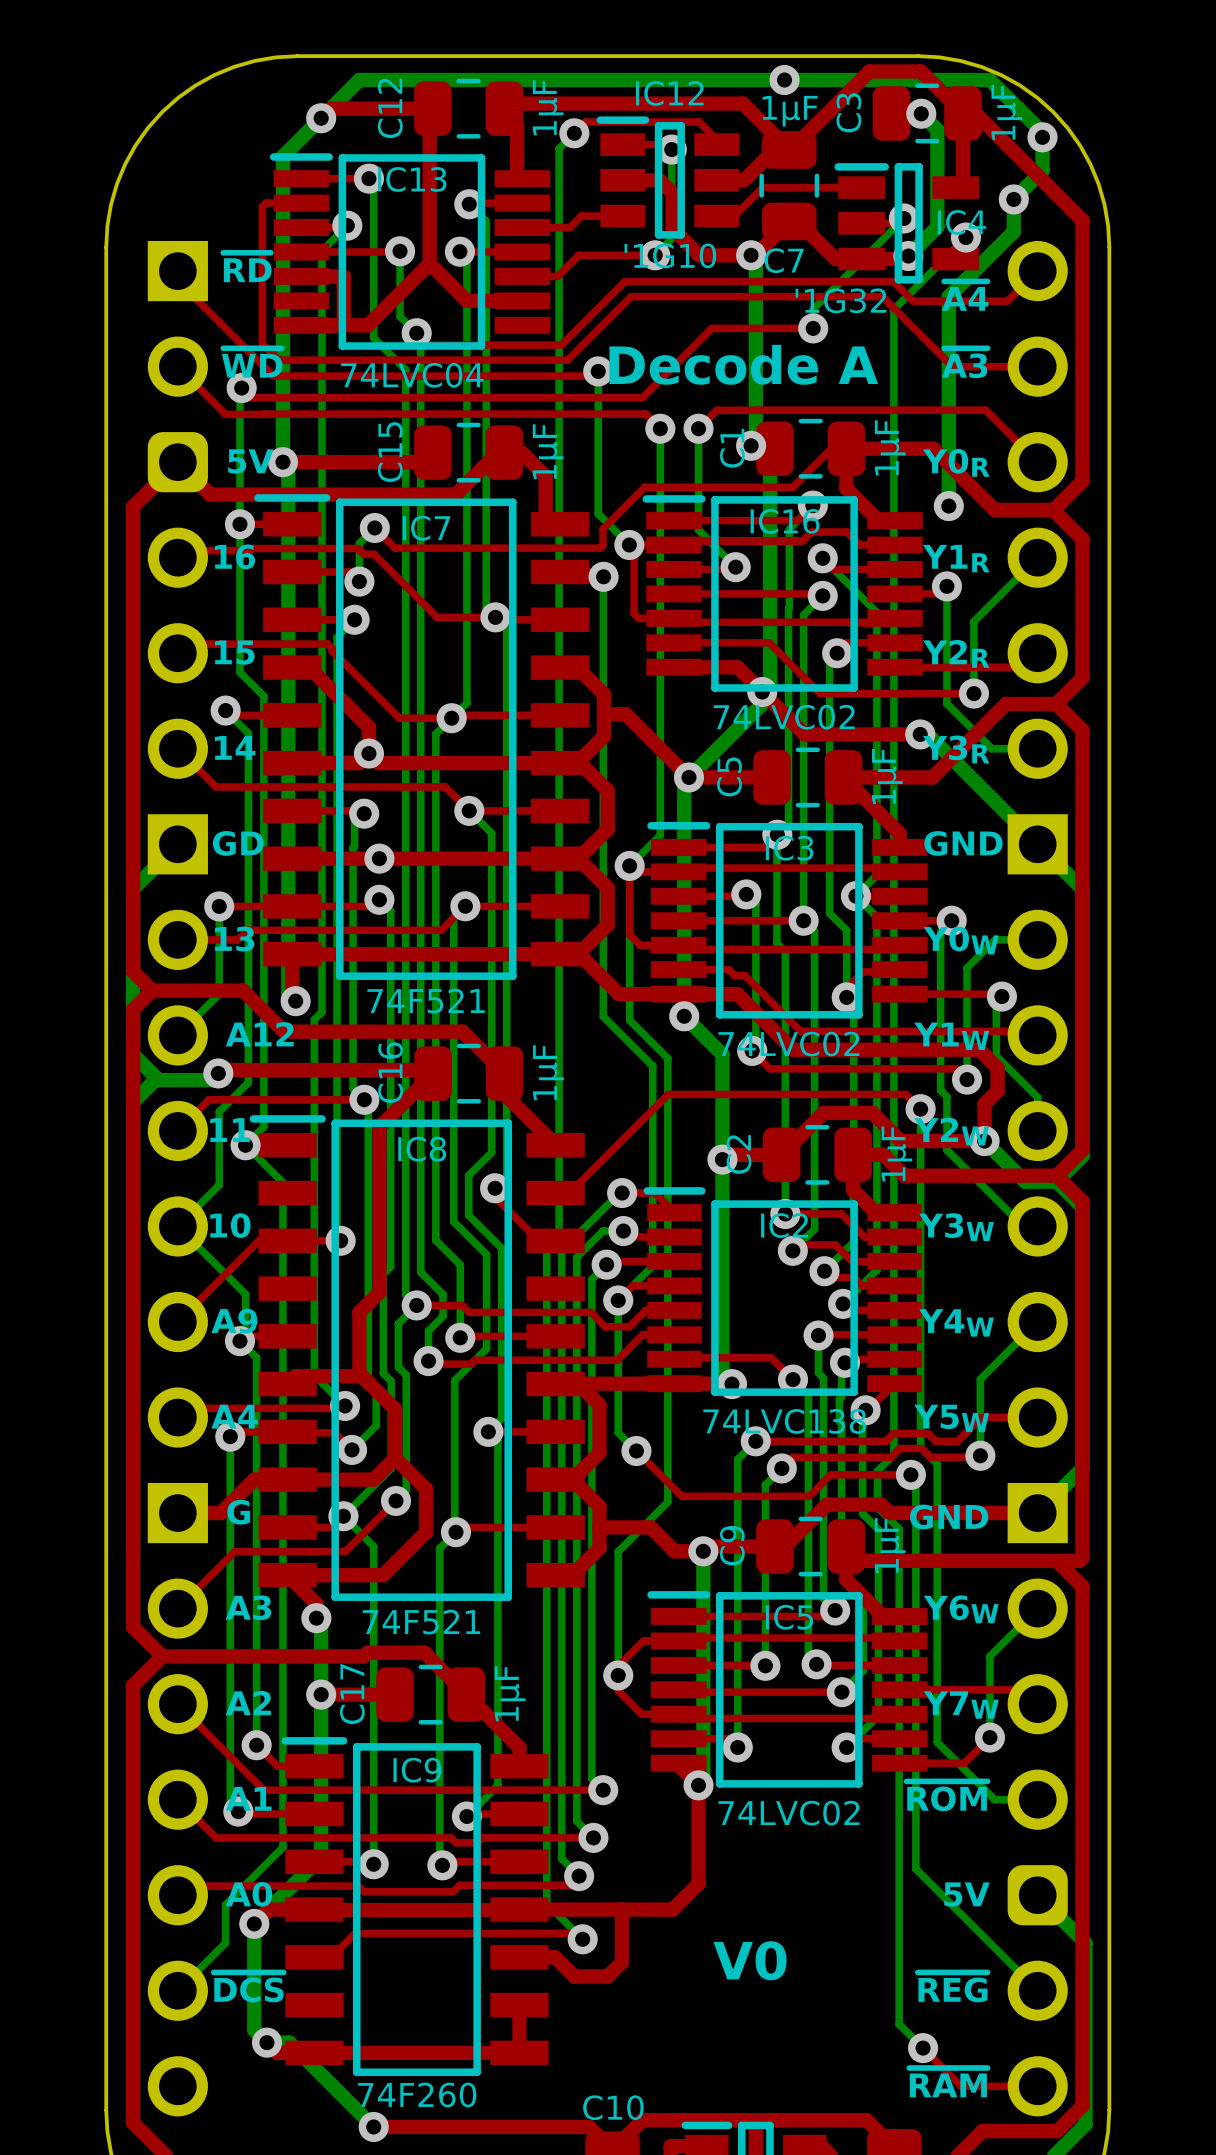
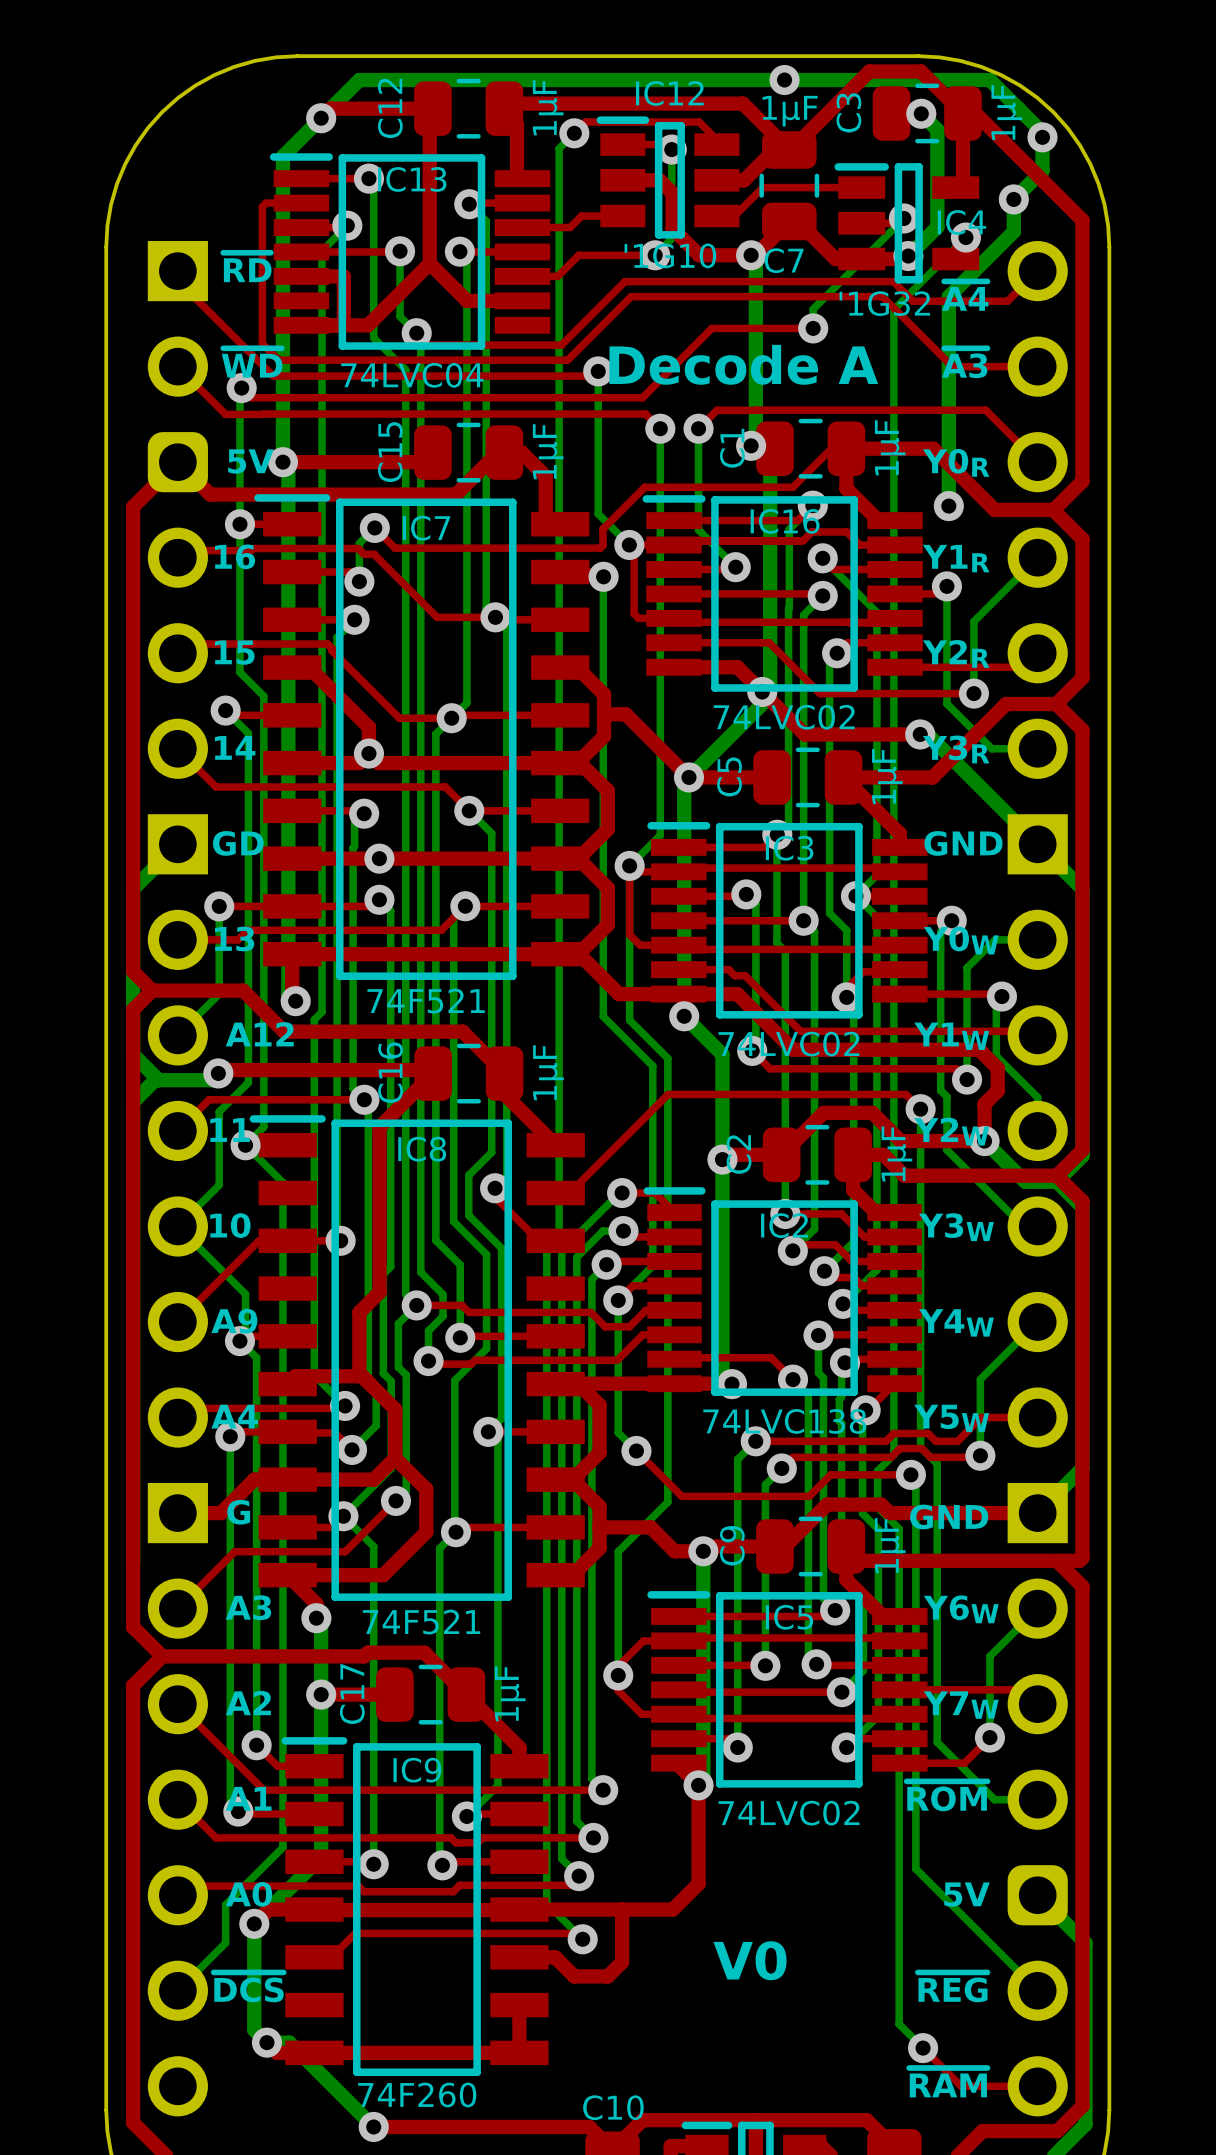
IC4 text position: '1G32 (840, 300) -> '1G32 (884, 303)

